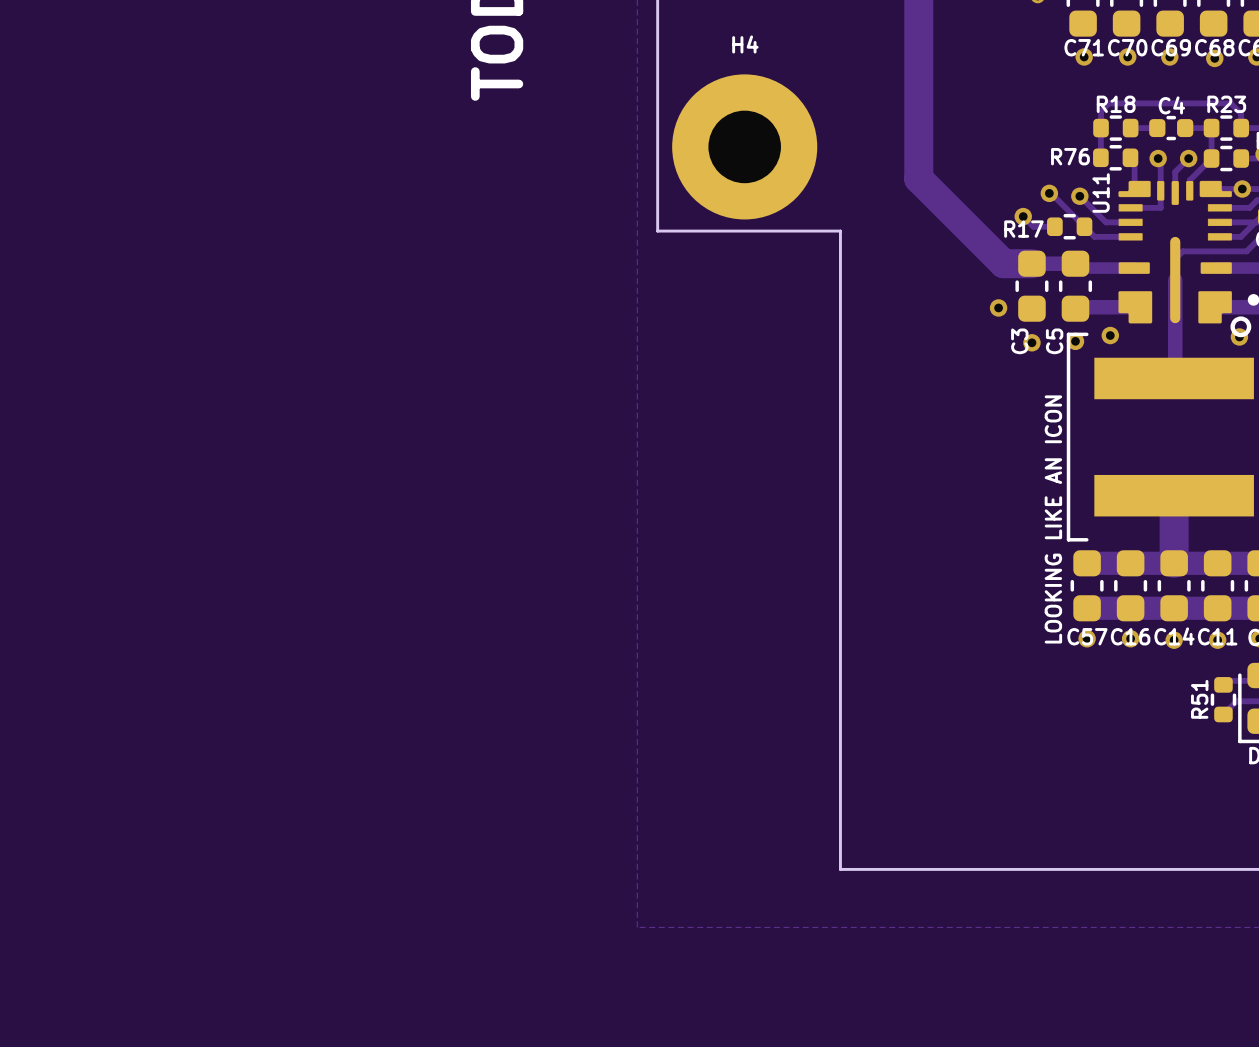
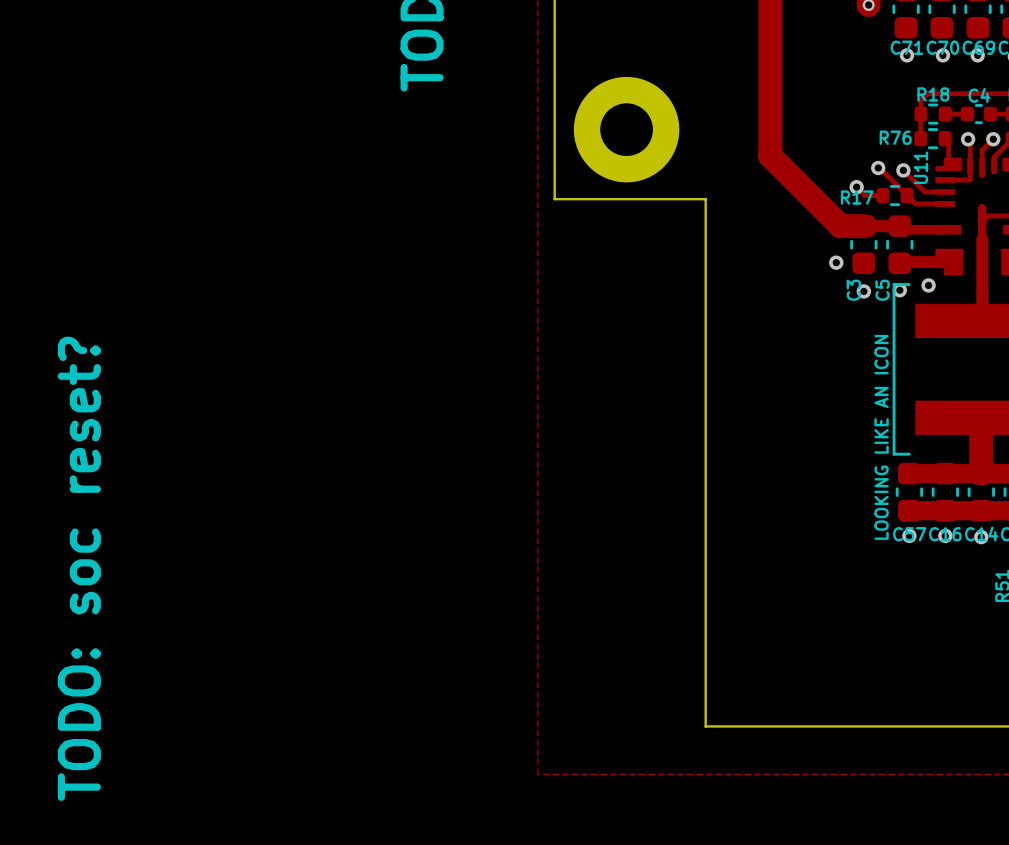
H4: (744, 146) -> none
part: none -> (626, 129)
text: none -> TODO: soc reset? (79, 568)

